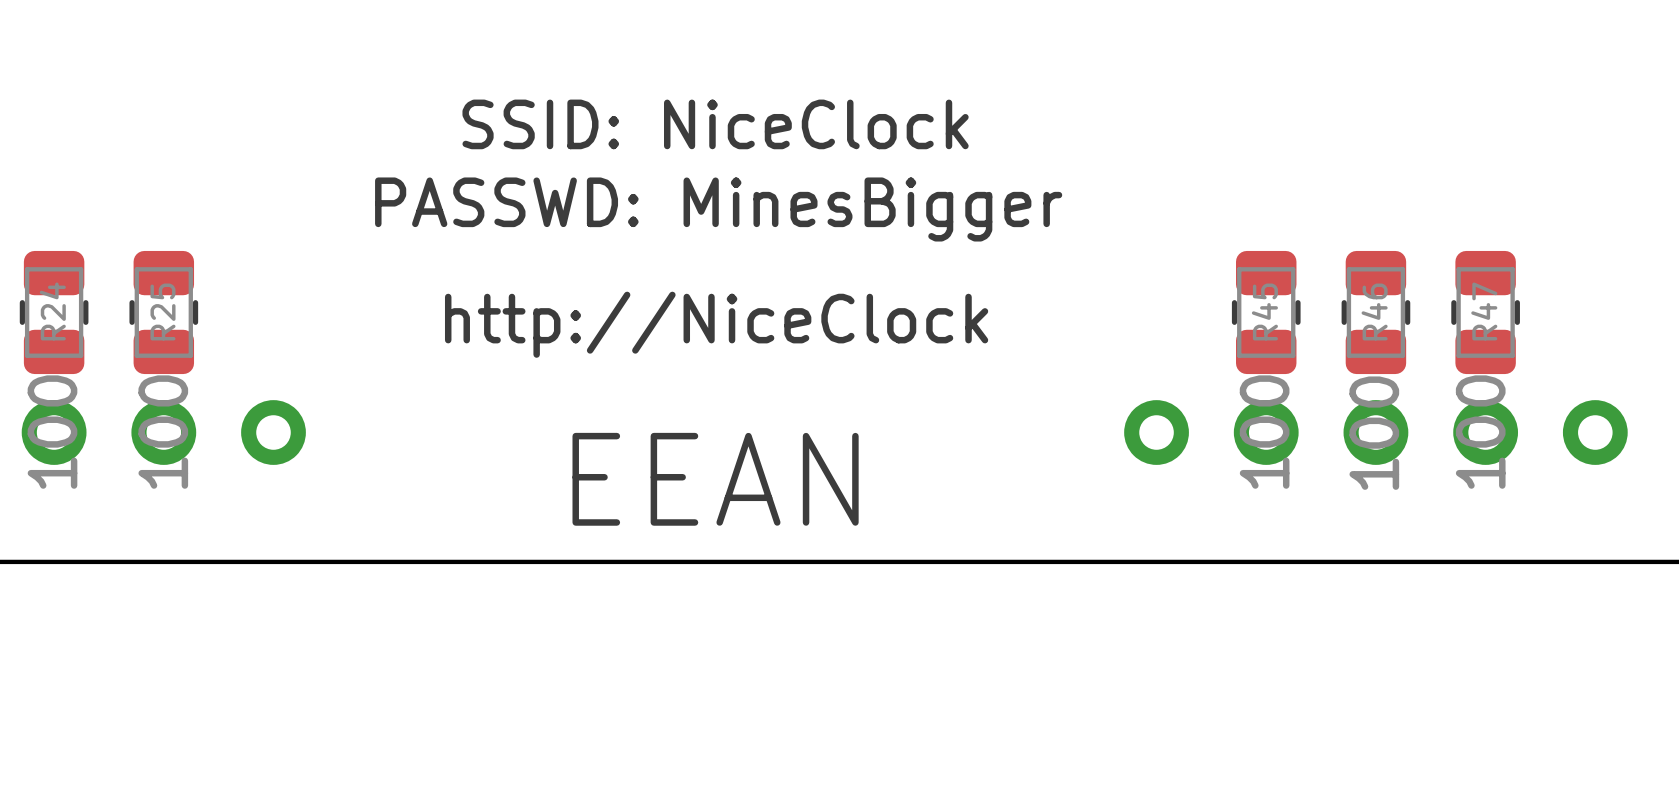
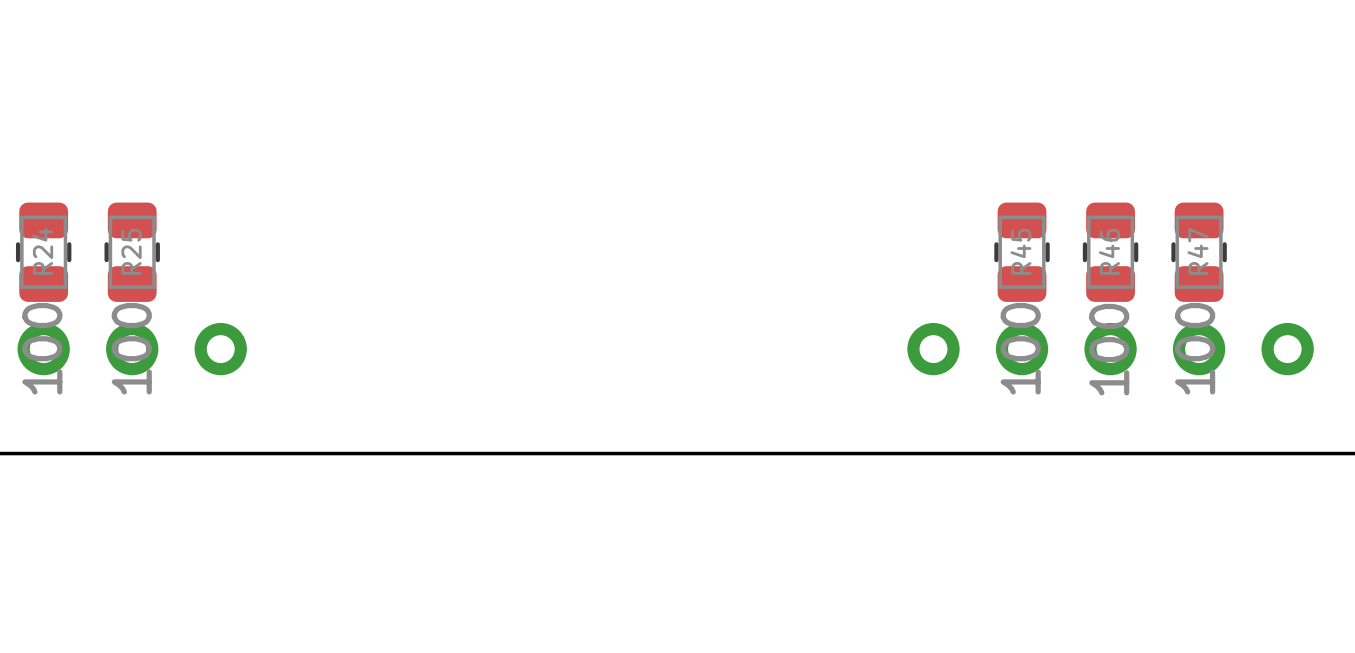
text: SSID: NiceClock (715, 124) -> none
text: PASSWD: MinesBigger (718, 209) -> none
text: http://NiceClock (716, 324) -> none
text: EEAN (715, 479) -> none

